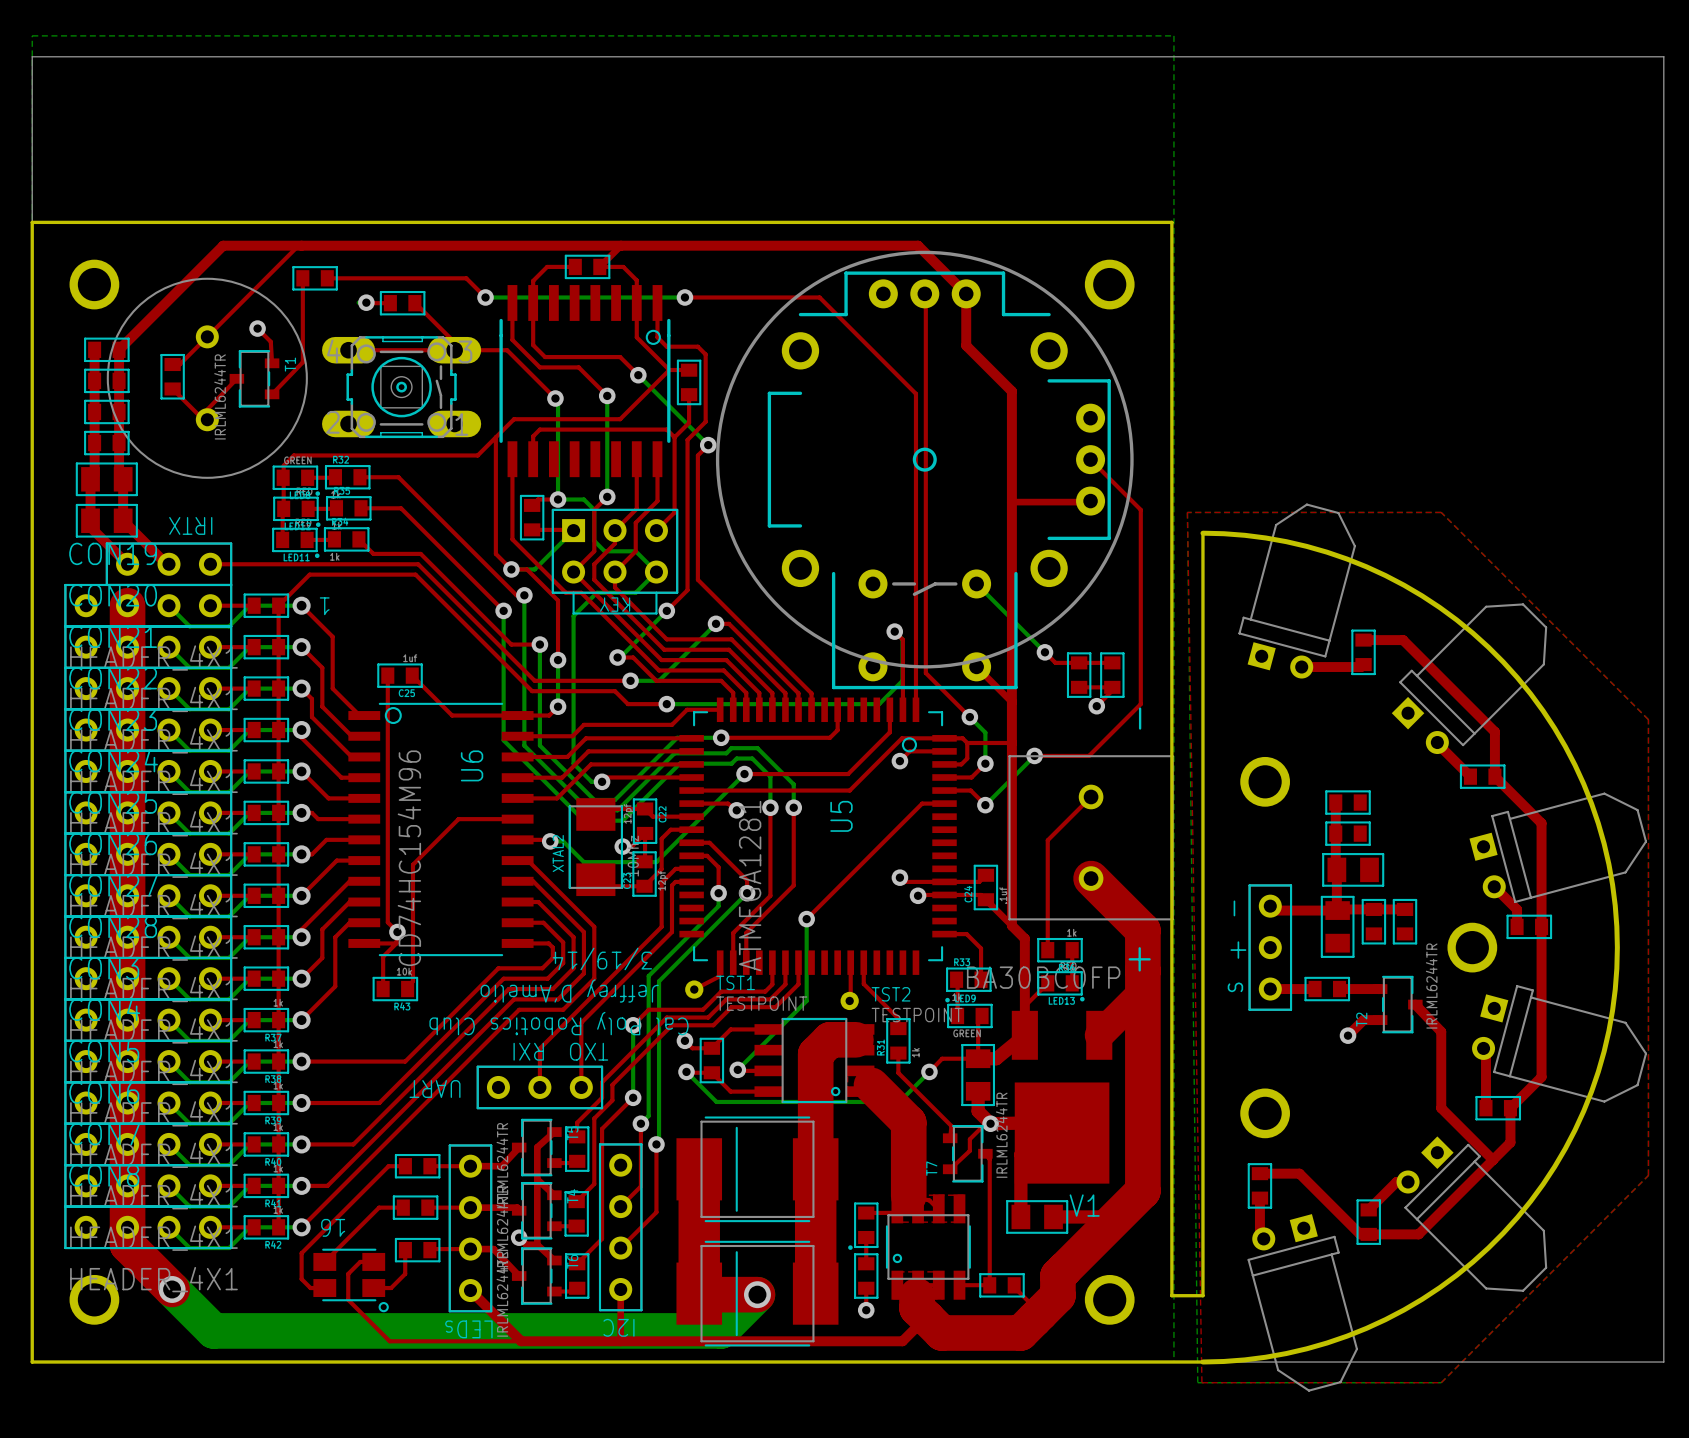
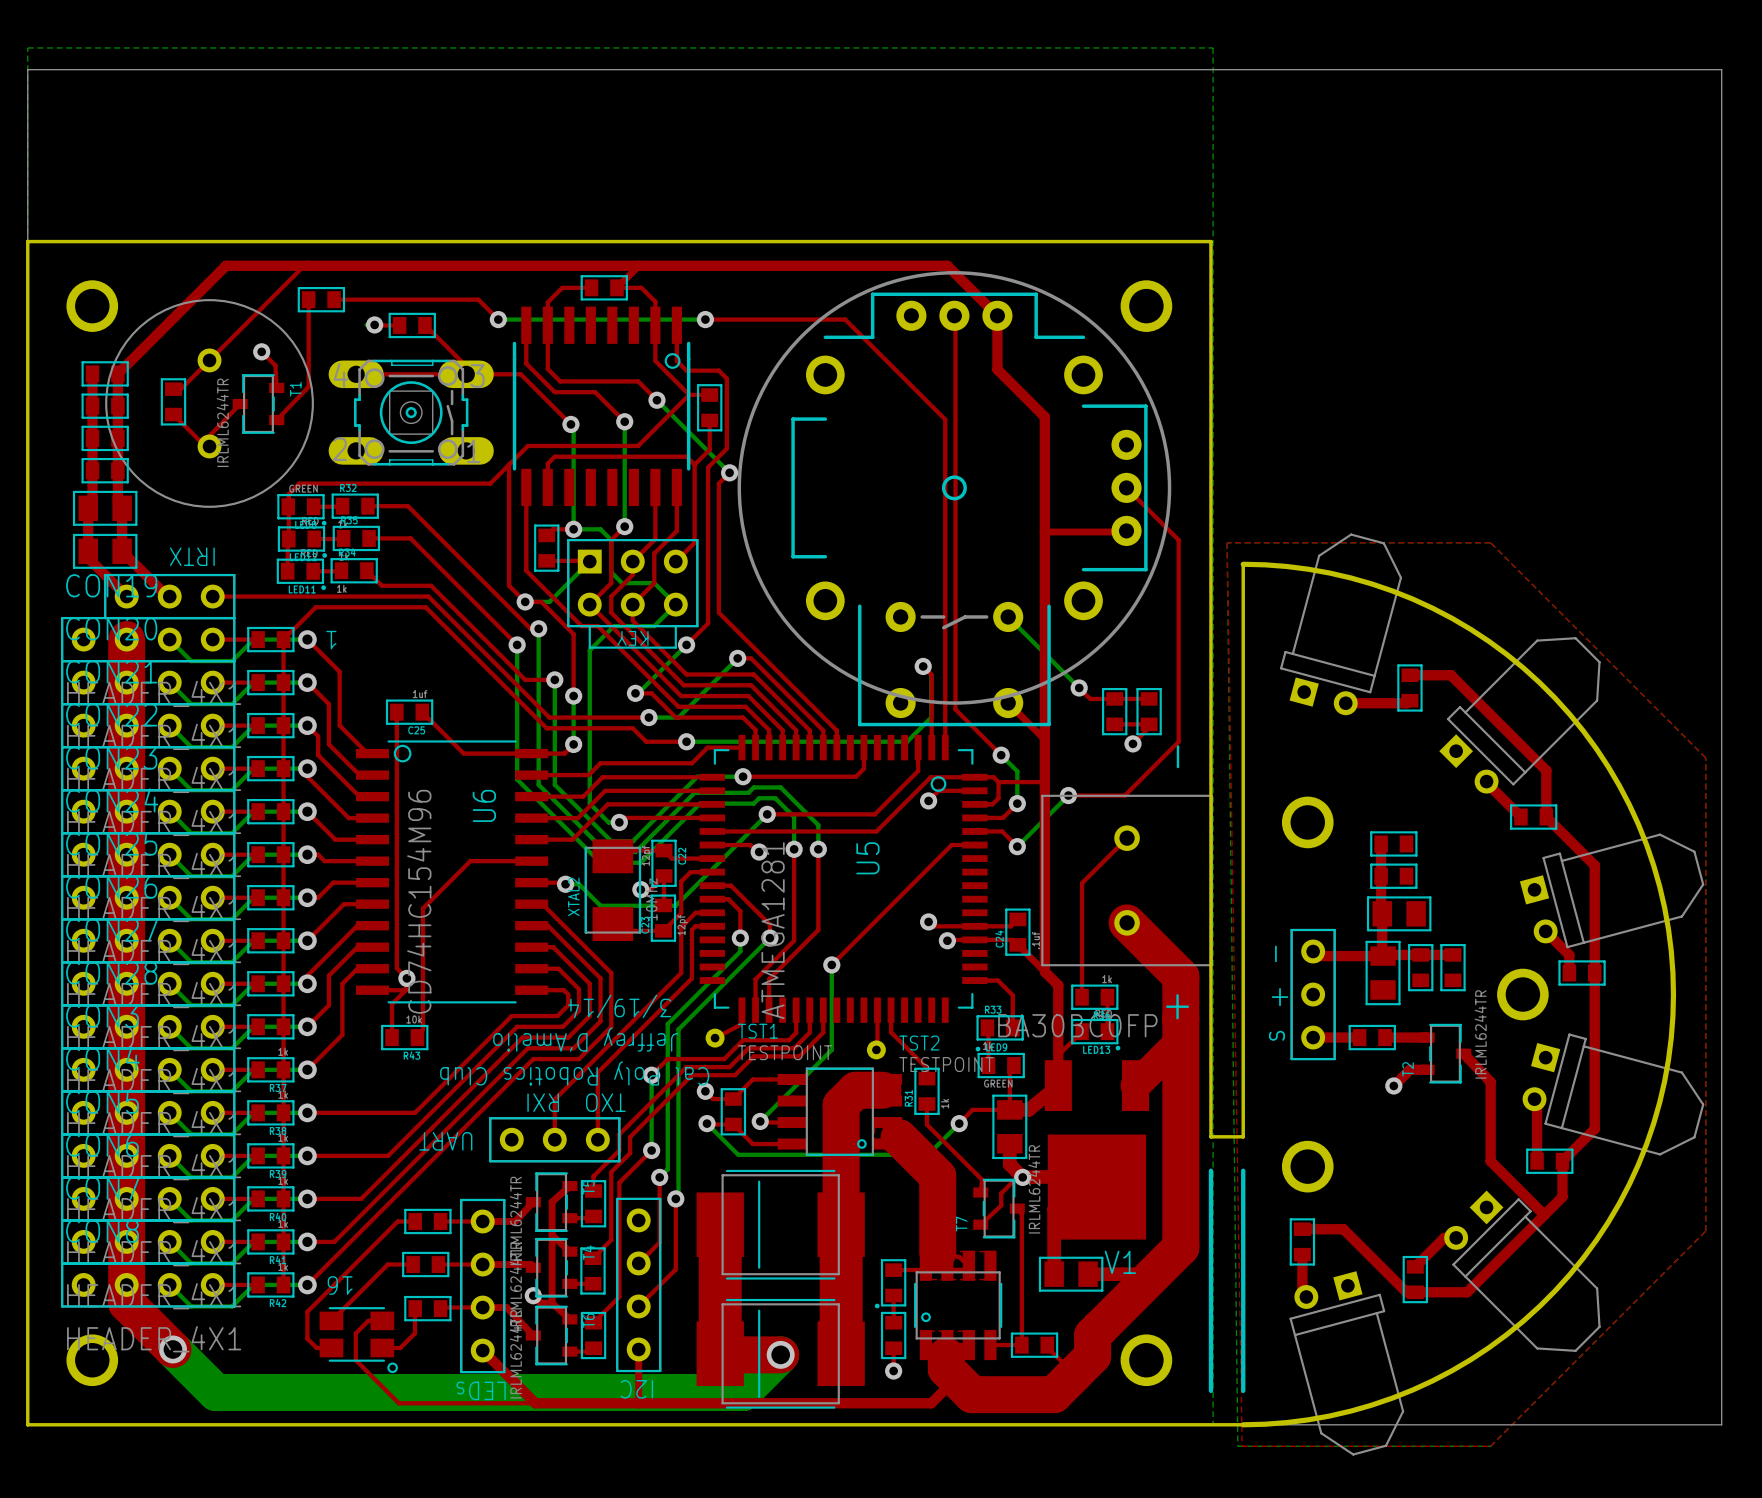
board edge: (1171, 1084) (1171, 1295) (1202, 1295) (1202, 1084) -> (1210, 1136) (1243, 1136)
line: none -> (1210, 1170) (1210, 1390)
line: none -> (1243, 1170) (1243, 1390)

